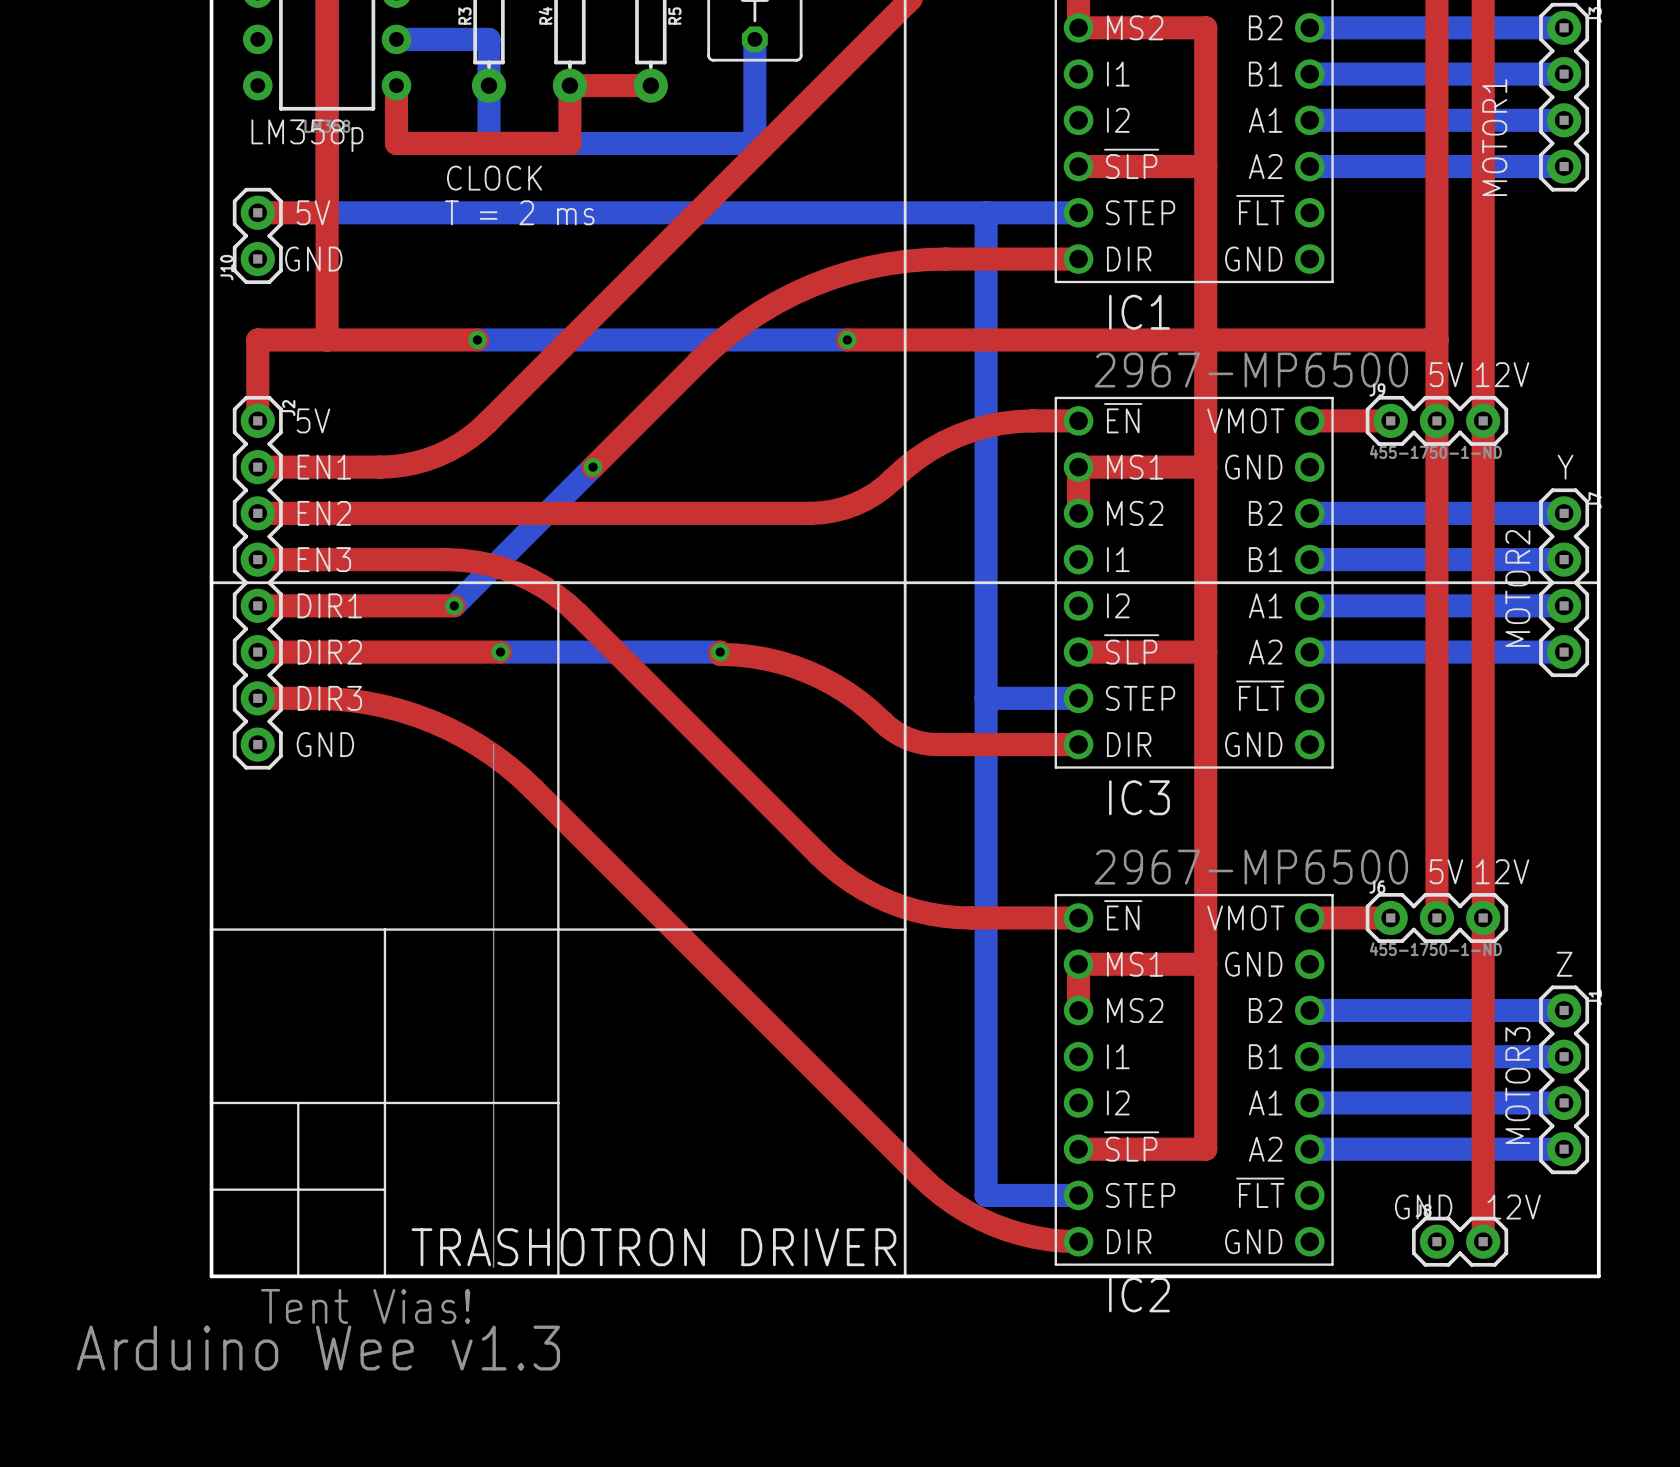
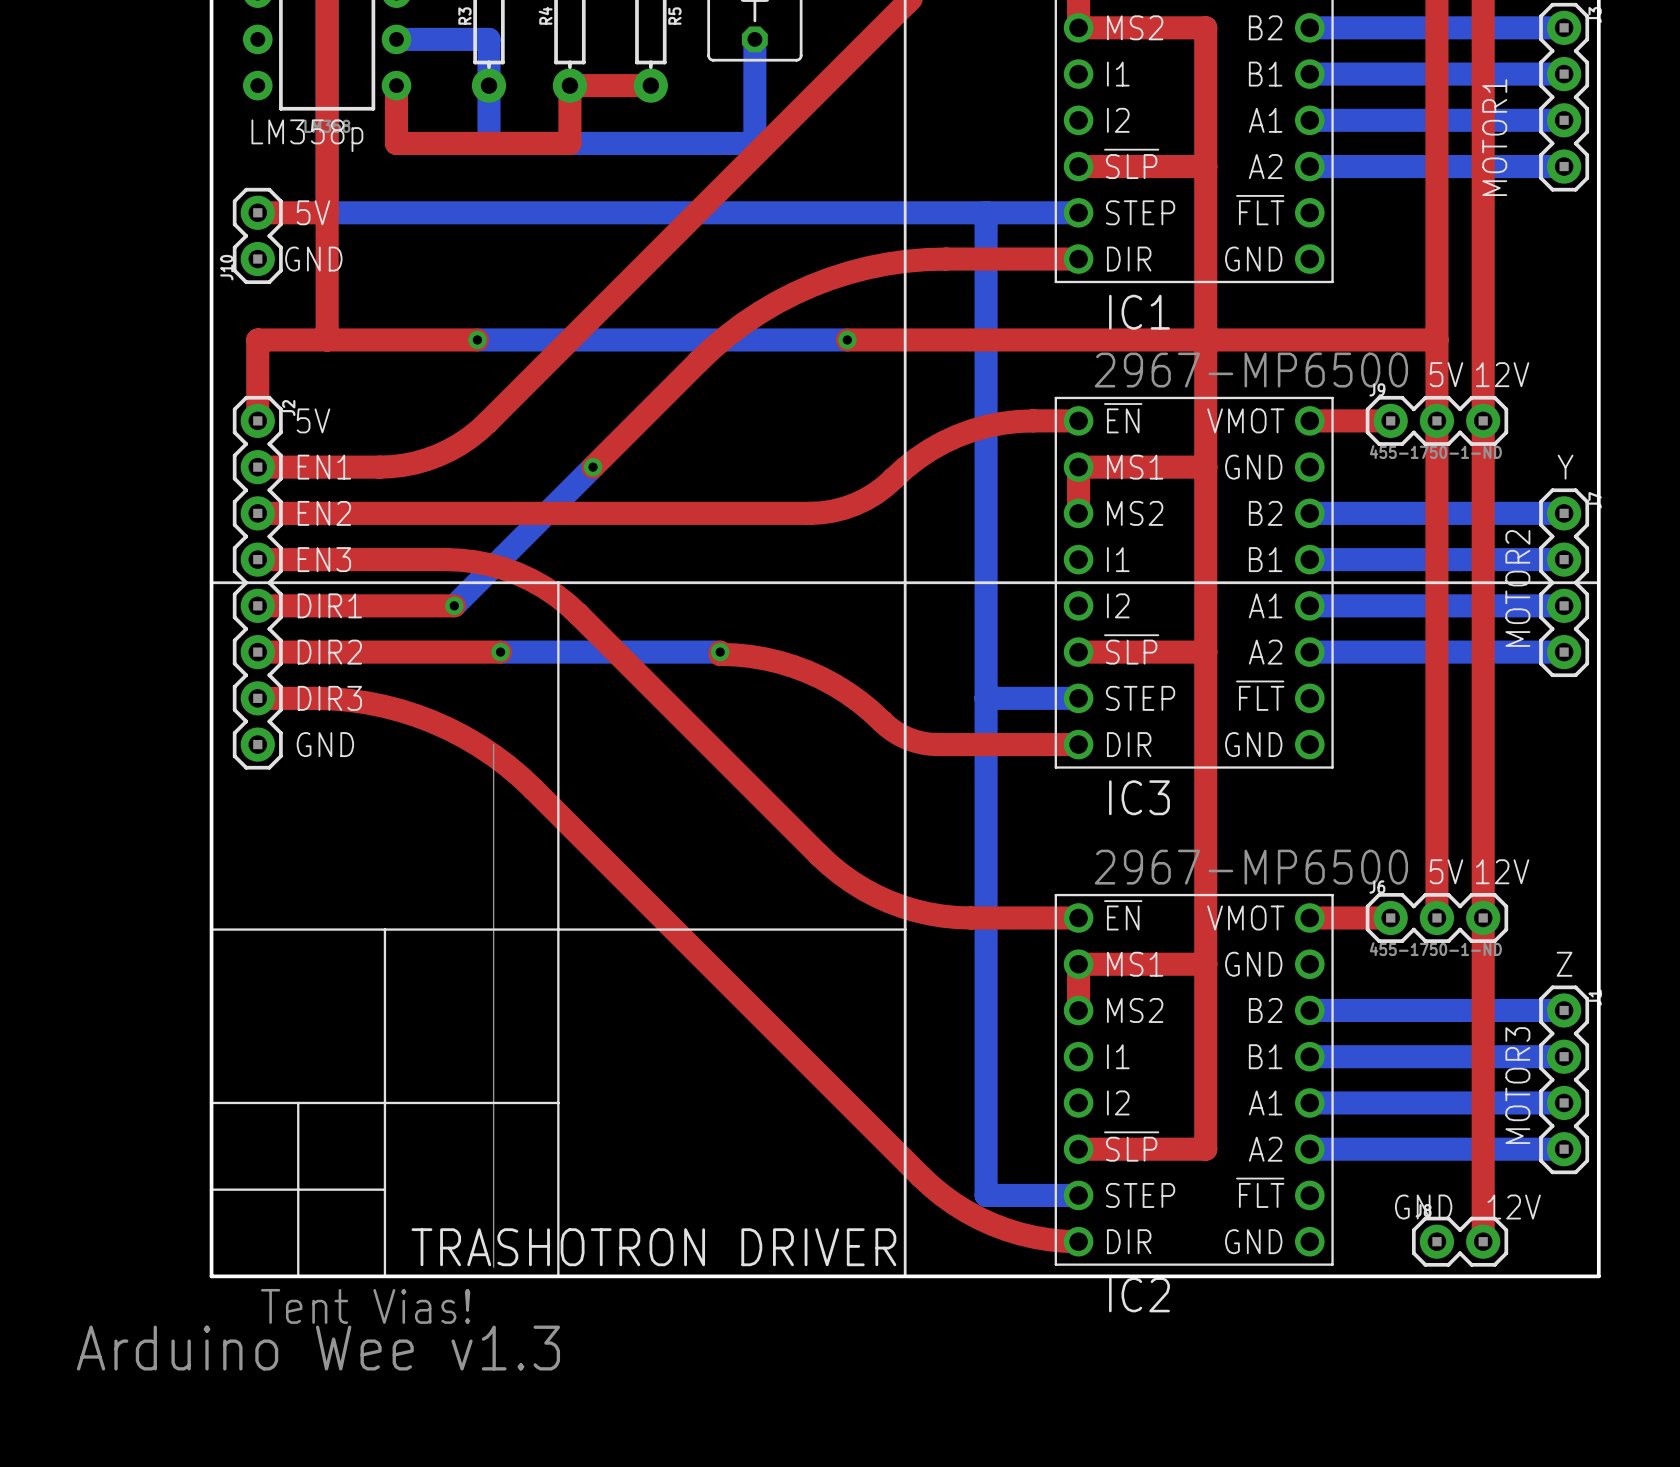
text: CLOCK (494, 178) -> none
text: T = 2 ms (519, 212) -> none

